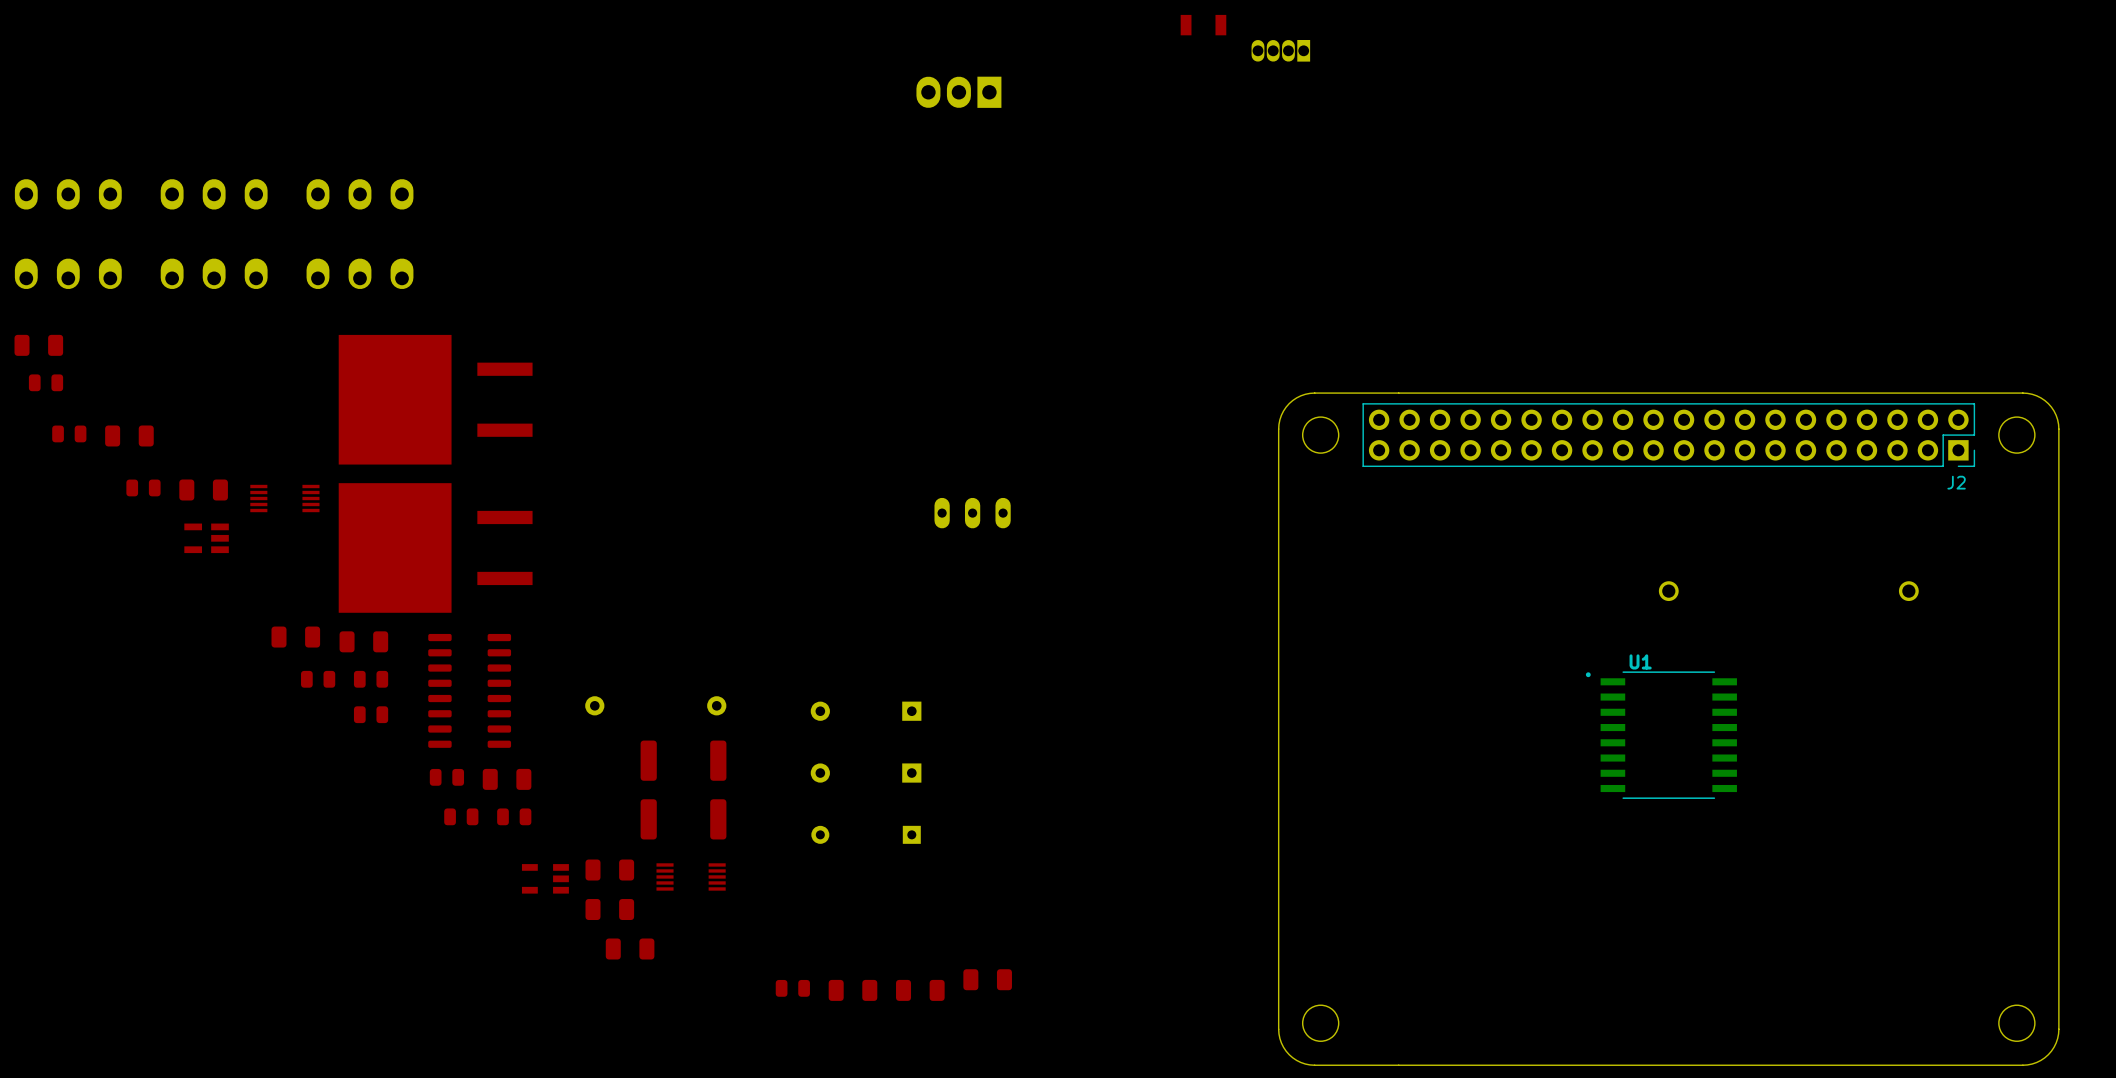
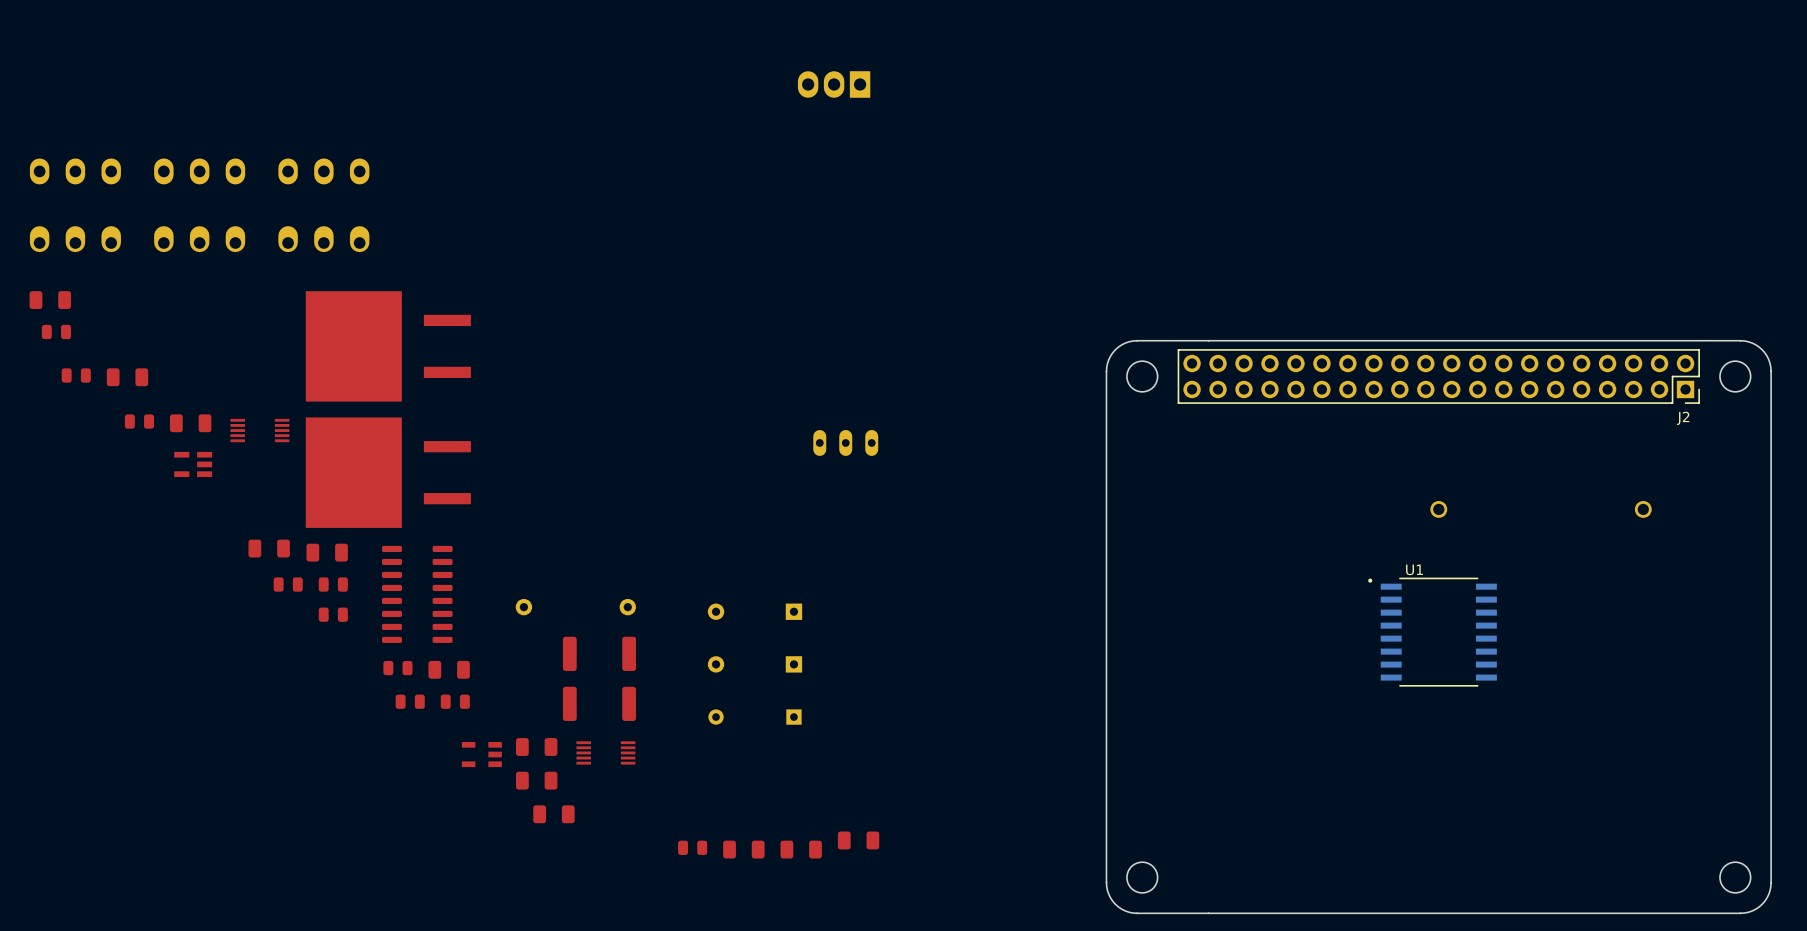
part: (1203, 25) -> none
part: (1280, 50) -> none

